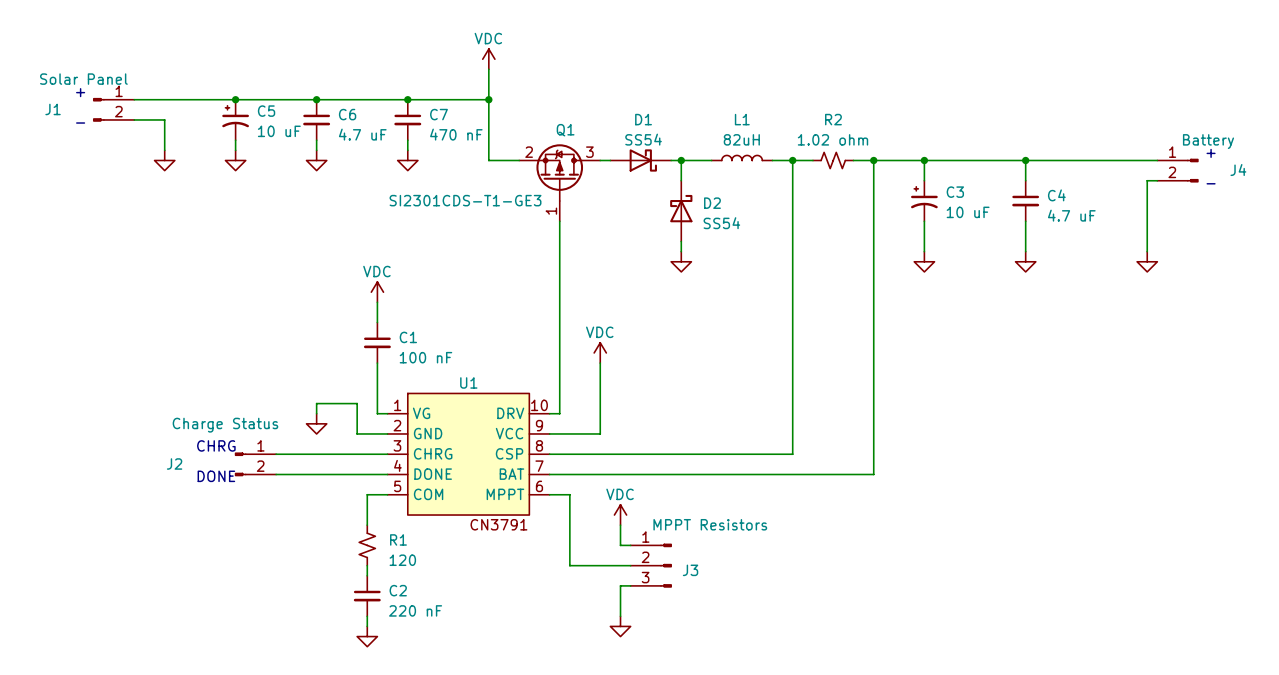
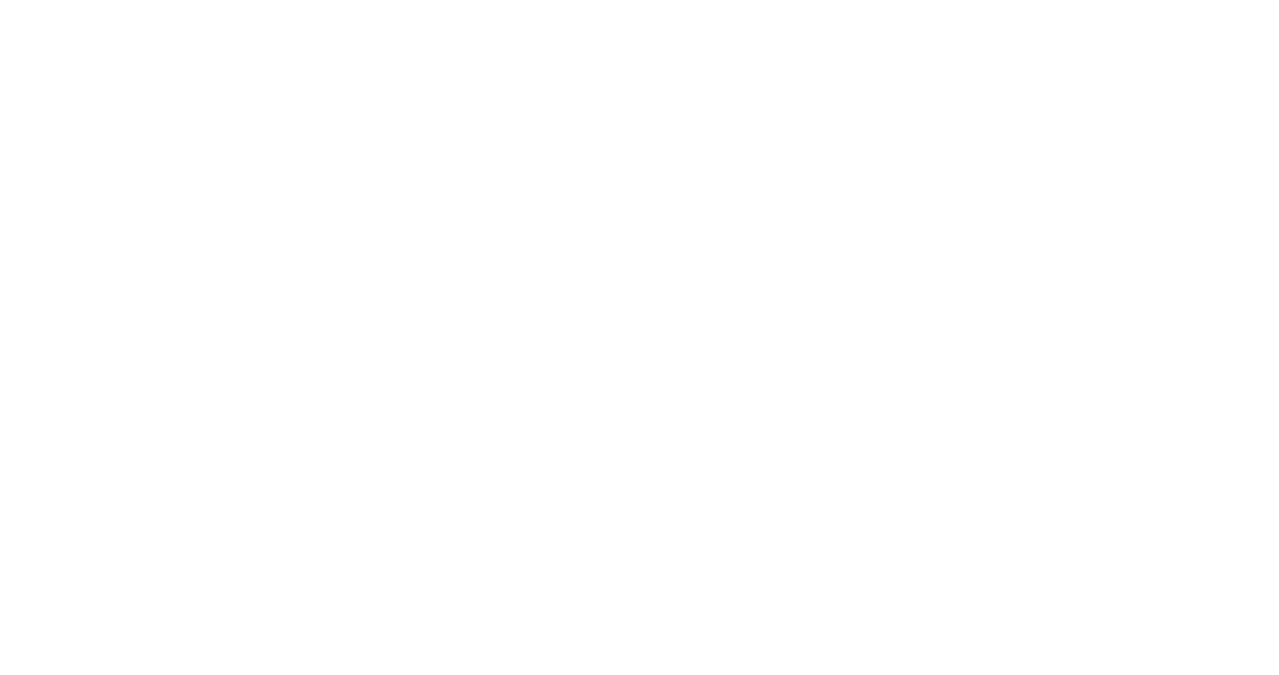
power symbol: VDC (488, 59) -> none
wire: (488, 69) (488, 160) (519, 160) -> none
text: + (80, 92) -> none
wire: (134, 99) (488, 99) -> none
junction: (235, 99) -> none
junction: (316, 99) -> none
junction: (407, 99) -> none
junction: (488, 99) -> none
J1: Solar Panel (113, 109) -> none
wire: (134, 119) (164, 119) (164, 150) -> none
C5: 10 uF (235, 119) -> none
C6: 4.7 uF (316, 119) -> none
C7: 470 nF (407, 119) -> none
text: - (80, 123) -> none
wire: (235, 140) (235, 150) -> none
wire: (316, 140) (316, 150) -> none
wire: (407, 140) (407, 150) -> none
text: + (1211, 153) -> none
82uH: L1 (742, 157) -> none
power symbol: (164, 160) -> none
power symbol: (235, 160) -> none
power symbol: (316, 160) -> none
power symbol: (407, 160) -> none
wire: (600, 160) (610, 160) -> none
D1: SS54 (640, 160) -> none
wire: (671, 160) (711, 160) -> none
wire: (681, 160) (681, 180) -> none
junction: (681, 160) -> none
wire: (772, 160) (812, 160) -> none
wire: (792, 160) (792, 454) (549, 454) -> none
junction: (792, 160) -> none
R2: 1.02 ohm (833, 160) -> none
wire: (853, 160) (1157, 160) -> none
wire: (873, 160) (873, 474) (549, 474) -> none
junction: (873, 160) -> none
wire: (924, 160) (924, 180) -> none
junction: (924, 160) -> none
wire: (1025, 160) (1025, 180) -> none
junction: (1025, 160) -> none
J4: Battery (1177, 170) -> none
wire: (1157, 180) (1147, 180) (1147, 251) -> none
Q1: SI2301CDS-T1-GE3 (559, 182) -> none
text: - (1211, 183) -> none
C3: 10 uF (924, 201) -> none
C4: 4.7 uF (1025, 201) -> none
D2: SS54 (681, 211) -> none
wire: (559, 221) (559, 413) (549, 413) -> none
wire: (924, 221) (924, 251) -> none
wire: (1025, 221) (1025, 251) -> none
wire: (681, 241) (681, 251) -> none
power symbol: (681, 261) -> none
power symbol: (924, 261) -> none
power symbol: (1025, 261) -> none
power symbol: (1147, 261) -> none
power symbol: VDC (377, 292) -> none
wire: (377, 302) (377, 322) -> none
C1: 100 nF (377, 342) -> none
power symbol: VDC (600, 352) -> none
wire: (377, 363) (377, 413) (387, 413) -> none
wire: (600, 363) (600, 433) (549, 433) -> none
wire: (316, 413) (316, 403) (357, 403) (357, 433) (387, 433) -> none
power symbol: (316, 423) -> none
text: CHRG (216, 445) -> none
wire: (276, 454) (387, 454) -> none
U1: (468, 454) -> none
J2: Charge Status (255, 464) -> none
wire: (276, 474) (387, 474) -> none
text: DONE (216, 476) -> none
wire: (387, 494) (367, 494) (367, 525) -> none
wire: (549, 494) (569, 494) (569, 565) (630, 565) -> none
power symbol: VDC (620, 515) -> none
wire: (620, 525) (620, 545) (630, 545) -> none
R1: 120 (367, 545) -> none
wire: (367, 565) (367, 575) -> none
J3: MPPT Resistors (651, 565) -> none
wire: (630, 585) (620, 585) (620, 616) -> none
C2: 220 nF (367, 596) -> none
wire: (367, 616) (367, 626) -> none
power symbol: (620, 626) -> none
power symbol: (367, 636) -> none

